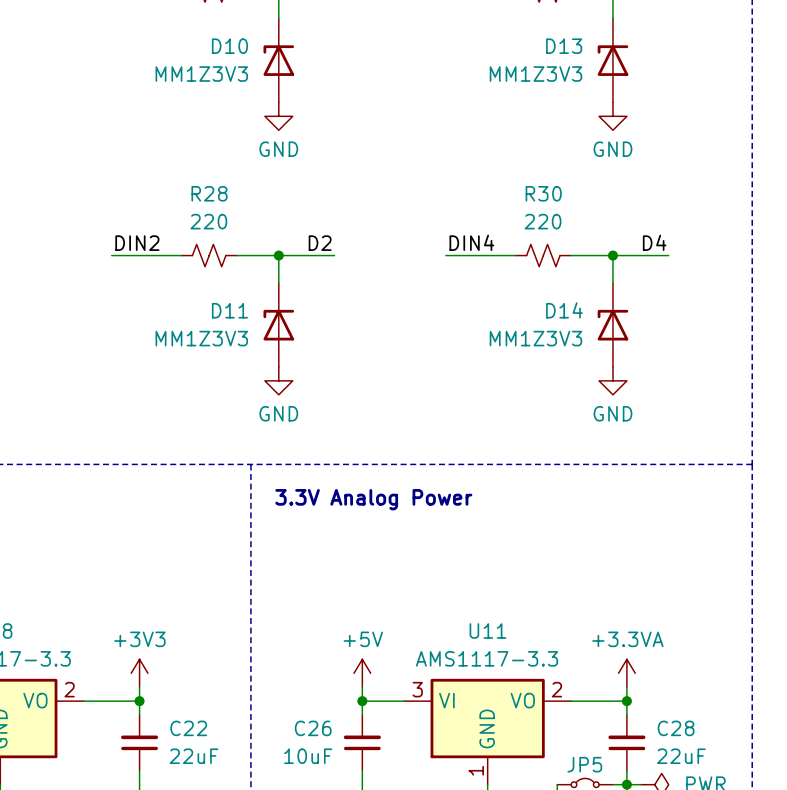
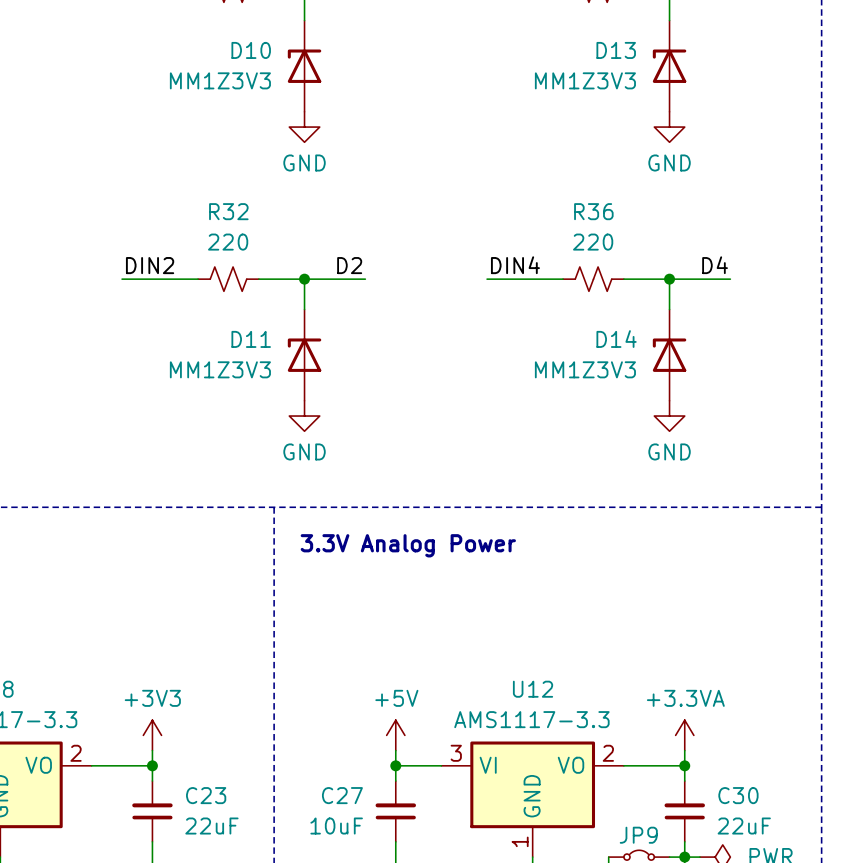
R28 name: R28 (209, 193) -> R32 (228, 211)
R30 name: R30 (543, 193) -> R36 (593, 211)
U11 name: U11 (487, 630) -> U12 (533, 689)
C22 name: C22 (188, 728) -> C23 (206, 795)
C26 name: C26 (313, 728) -> C27 (342, 795)
C28 name: C28 (676, 728) -> C30 (738, 795)
JP5 name: JP5 (584, 764) -> JP9 (638, 835)

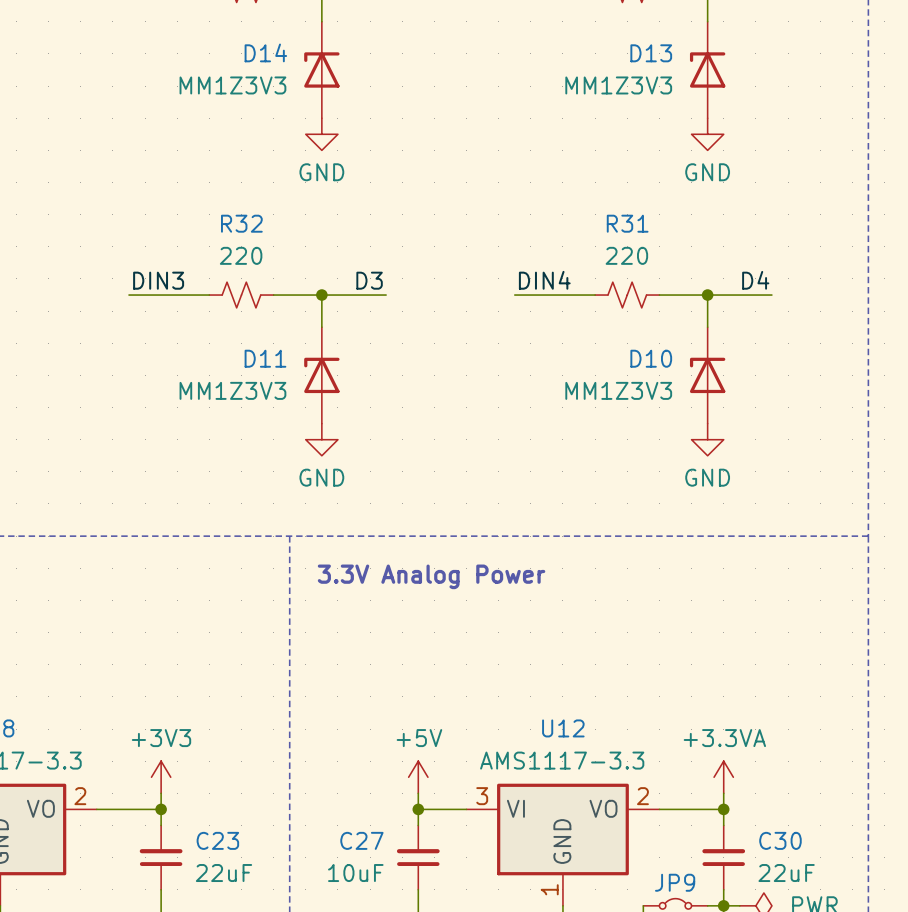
D10 name: D10 (251, 50) -> D14 (265, 52)
R36 name: R36 (593, 211) -> R31 (627, 223)
label: DIN2 (150, 265) -> DIN3 (158, 280)
label: D2 (349, 265) -> D3 (369, 280)
D14 name: D14 (616, 339) -> D10 (651, 358)

